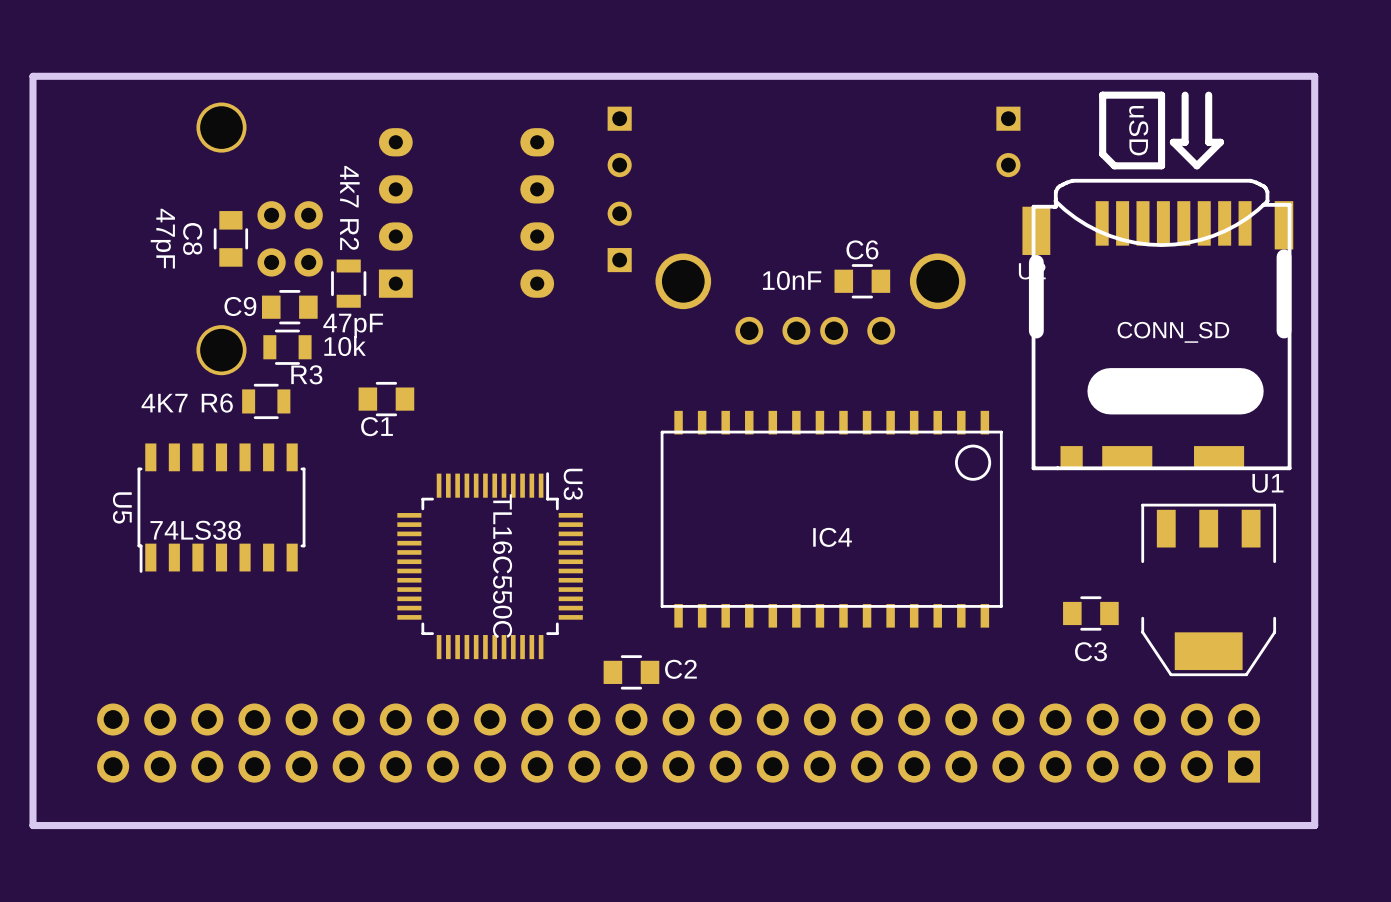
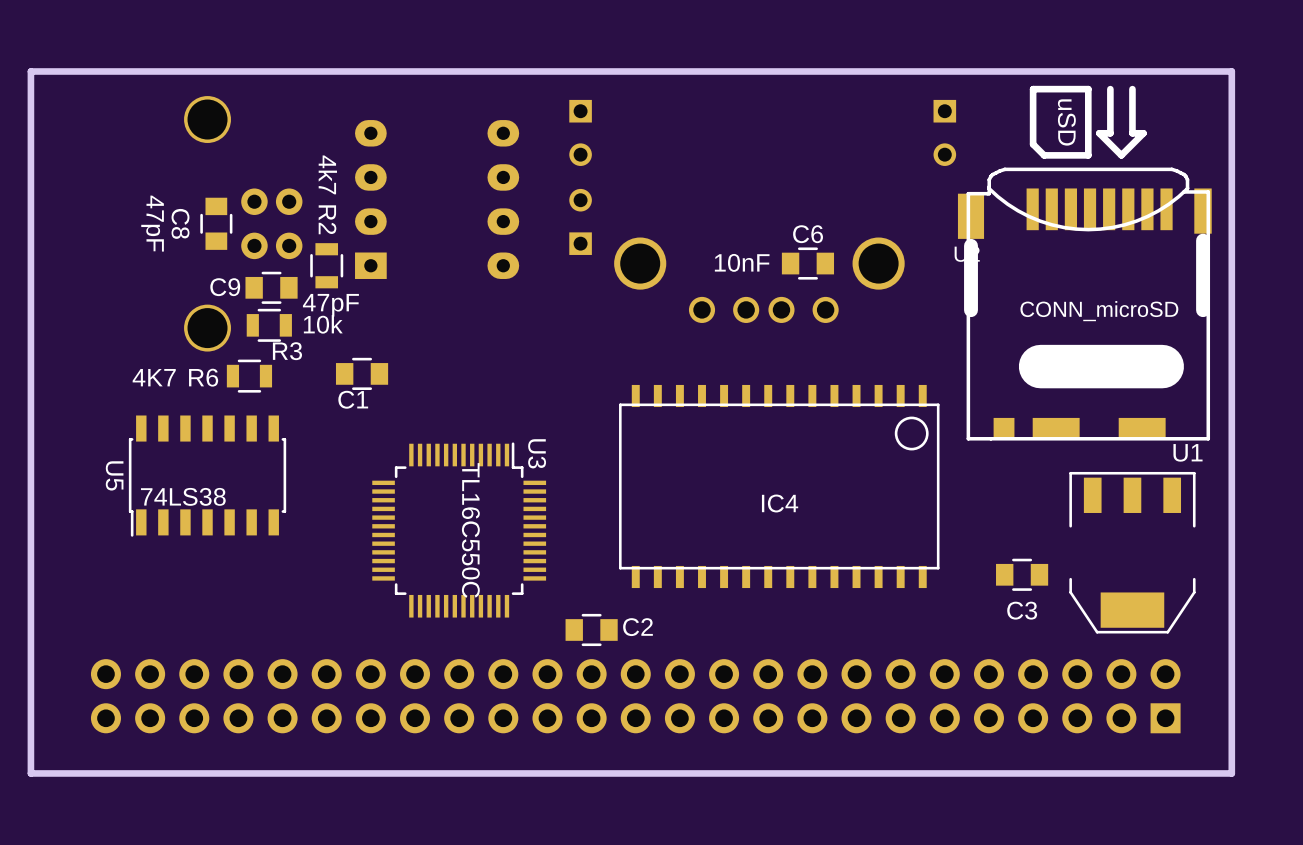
part value: CONN_SD (1173, 332) -> CONN_microSD (1099, 311)

